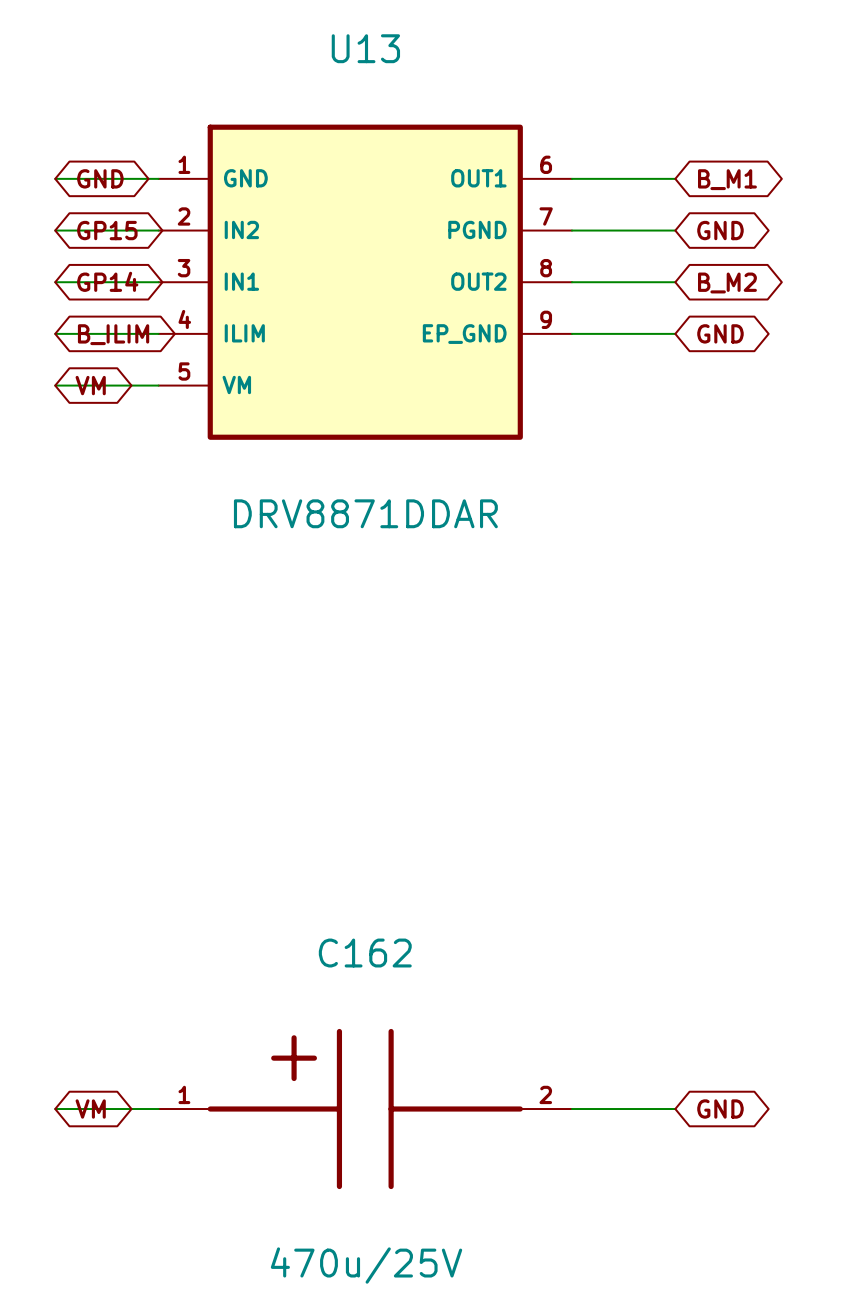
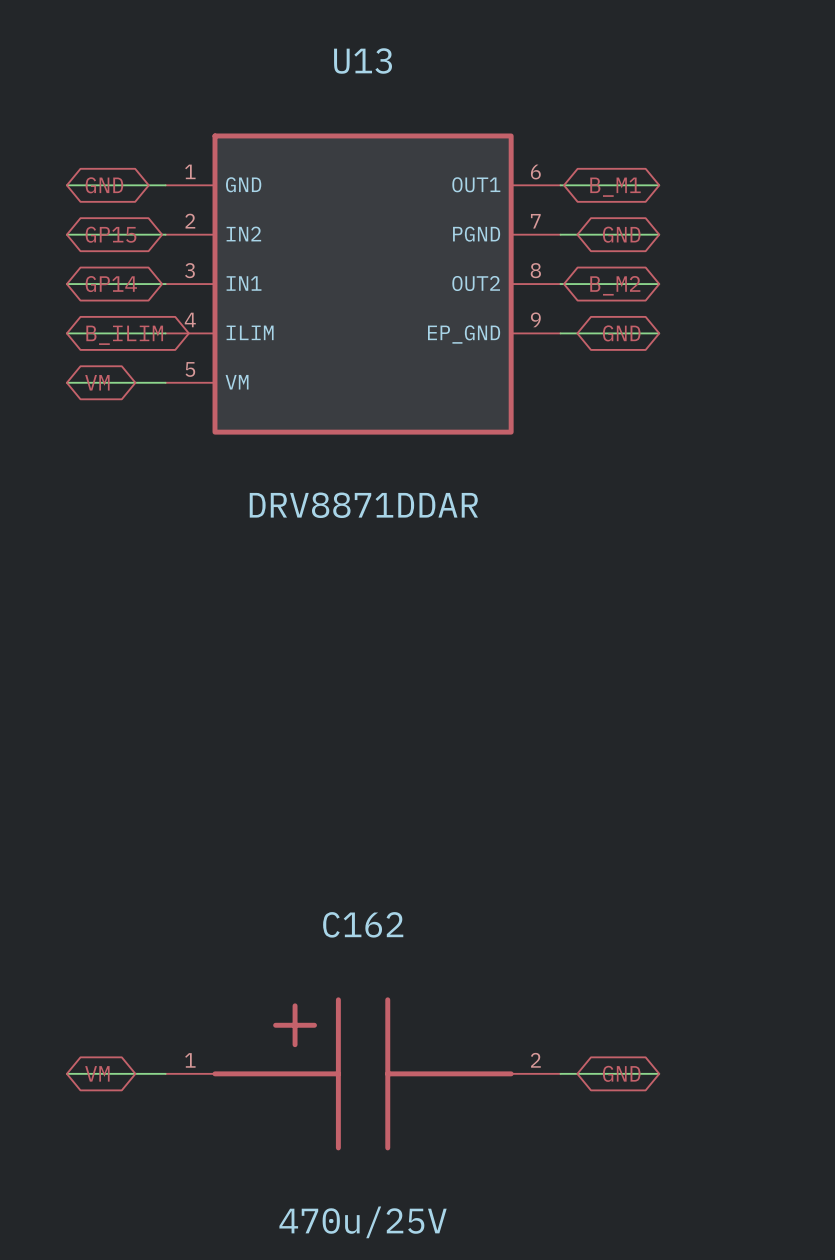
global label rotation: 0° (727, 179) -> 180° (615, 187)
global label rotation: 0° (720, 230) -> 180° (621, 234)
global label rotation: 0° (727, 282) -> 180° (615, 285)
global label rotation: 0° (720, 333) -> 180° (621, 333)
global label rotation: 0° (720, 1109) -> 180° (621, 1073)

